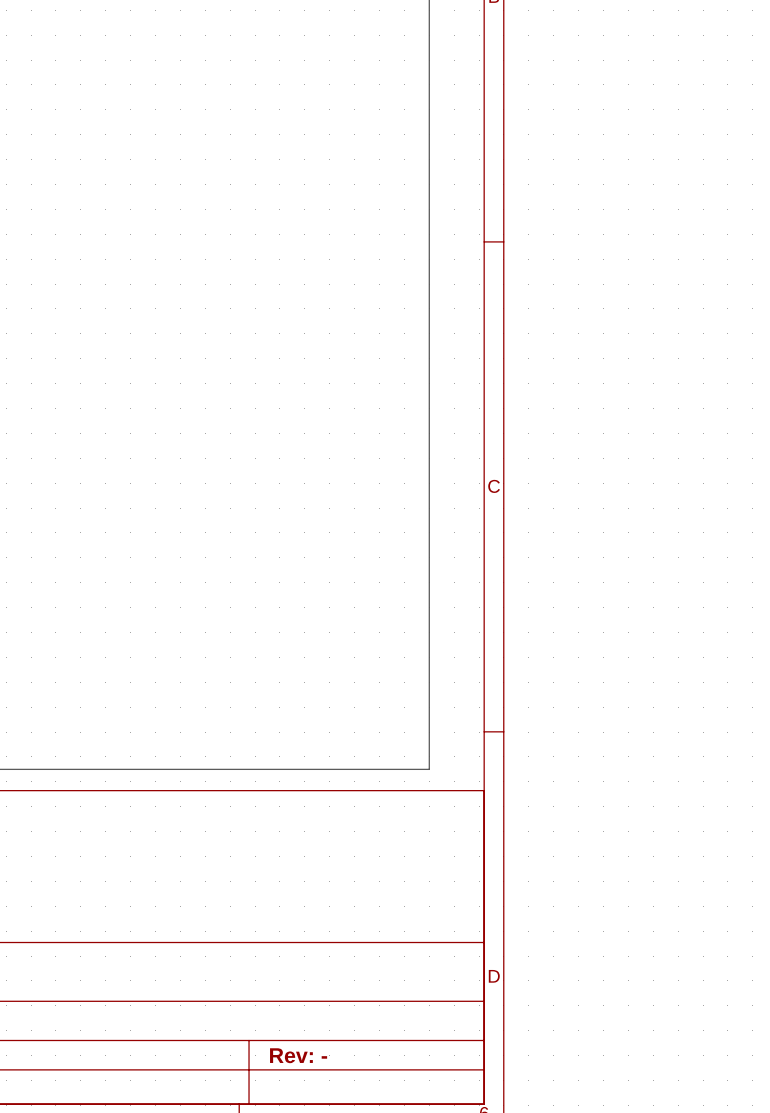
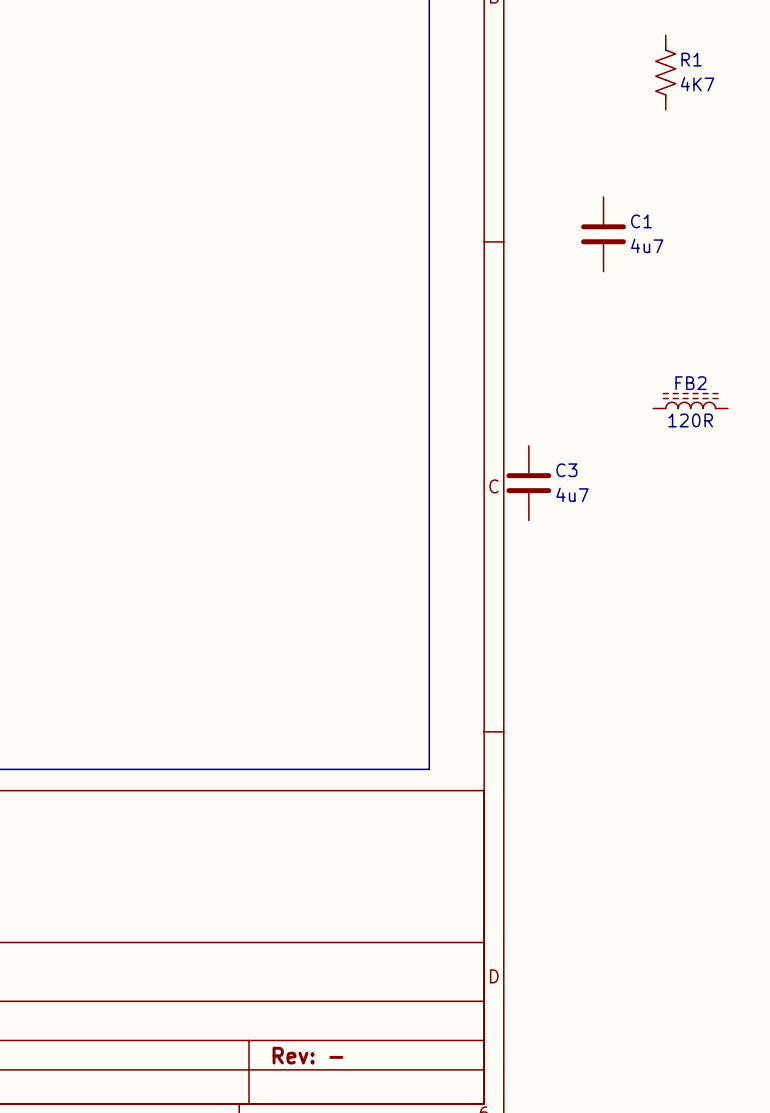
R1: none -> 4K7 (665, 72)
C1: none -> 4u7 (603, 234)
FB2: none -> 120R (690, 401)
C3: none -> 4u7 (528, 483)

